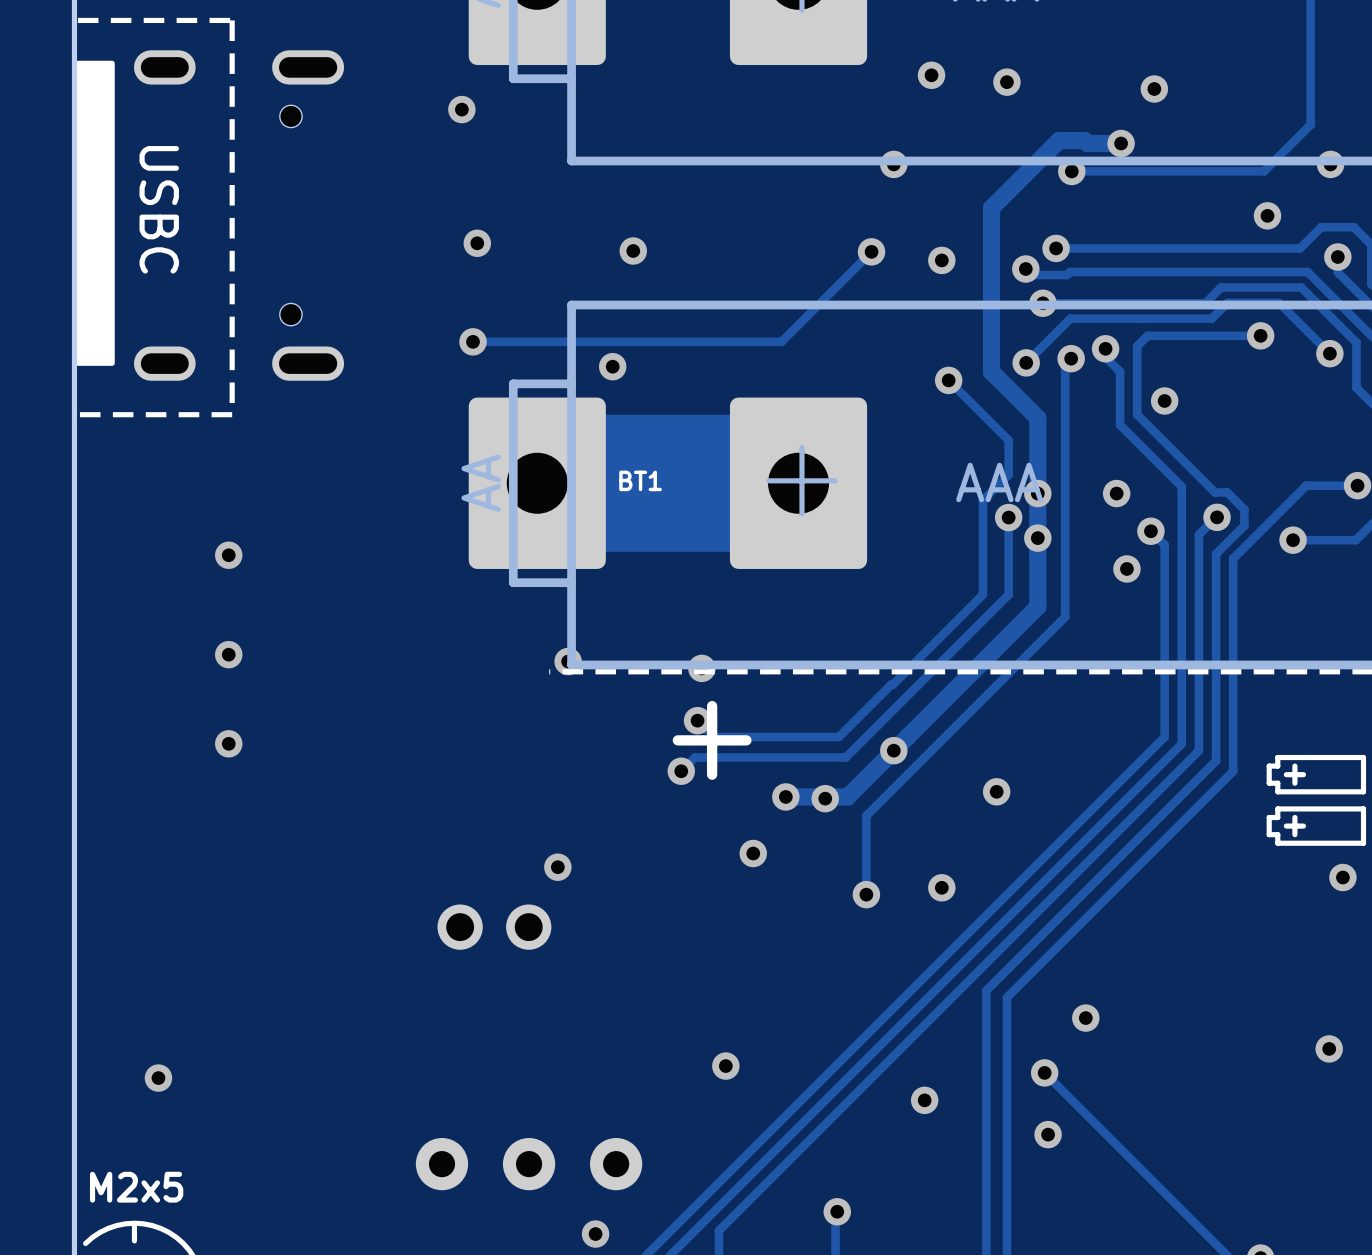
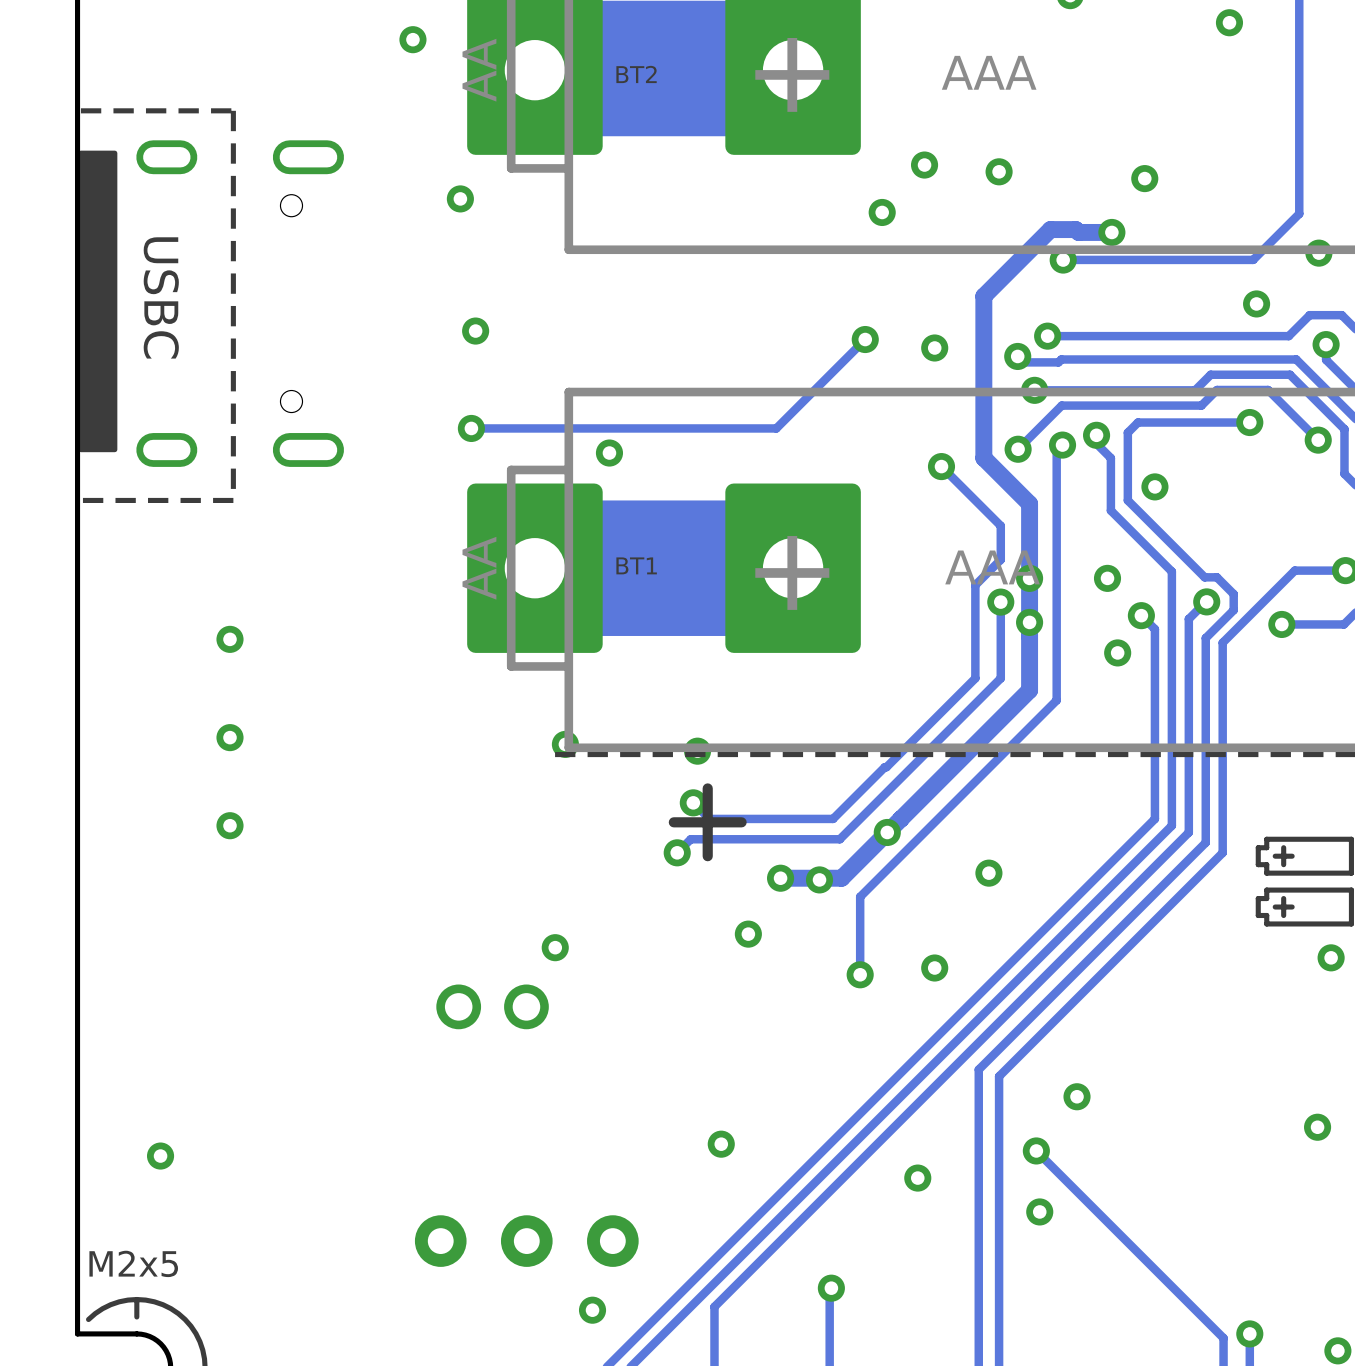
via position: (893, 164) -> (882, 212)
via: (633, 251) -> none

